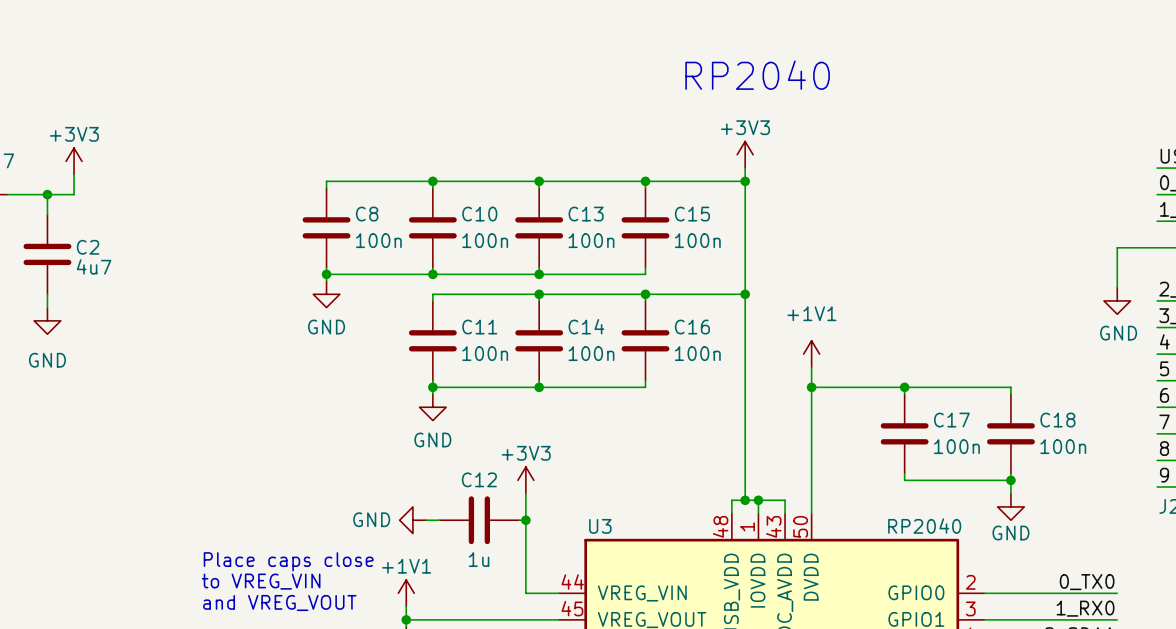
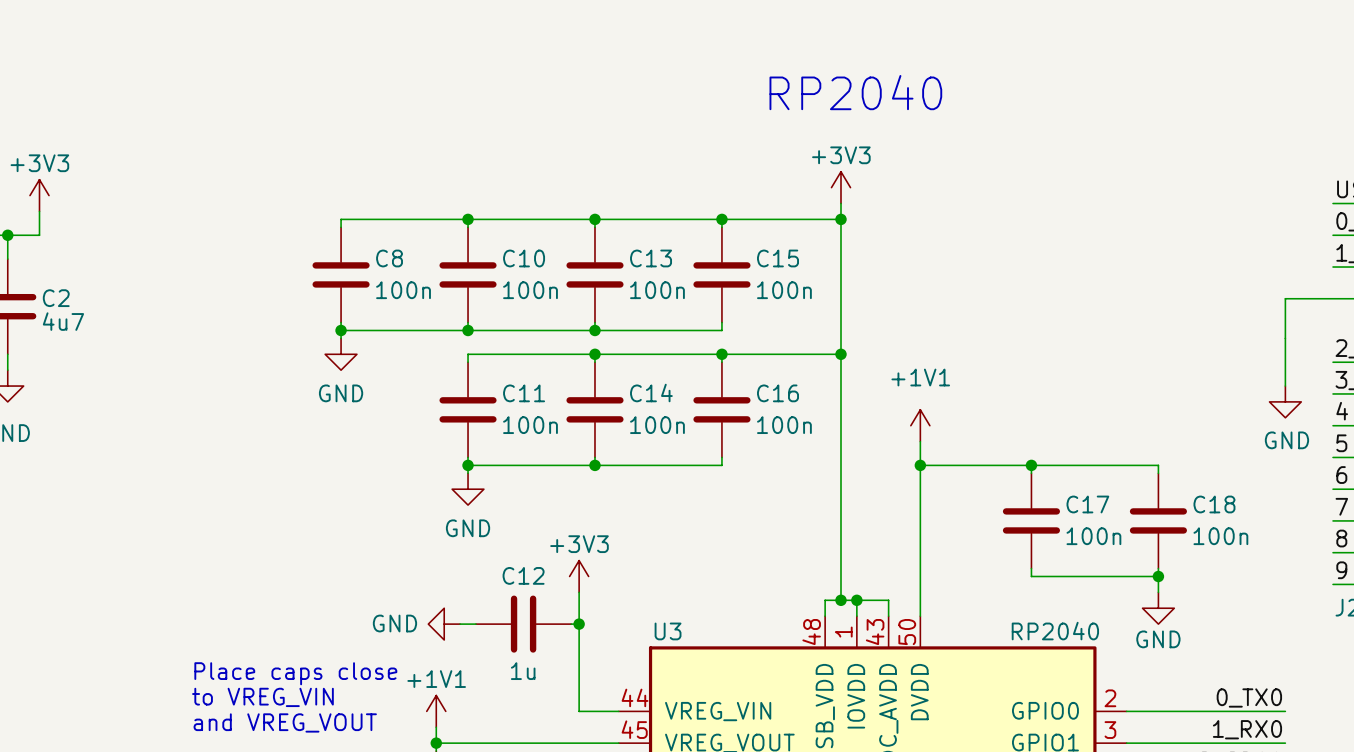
wire: none -> (1285, 346) (1285, 386)
power symbol position: GND (1117, 300) -> GND (1285, 401)

